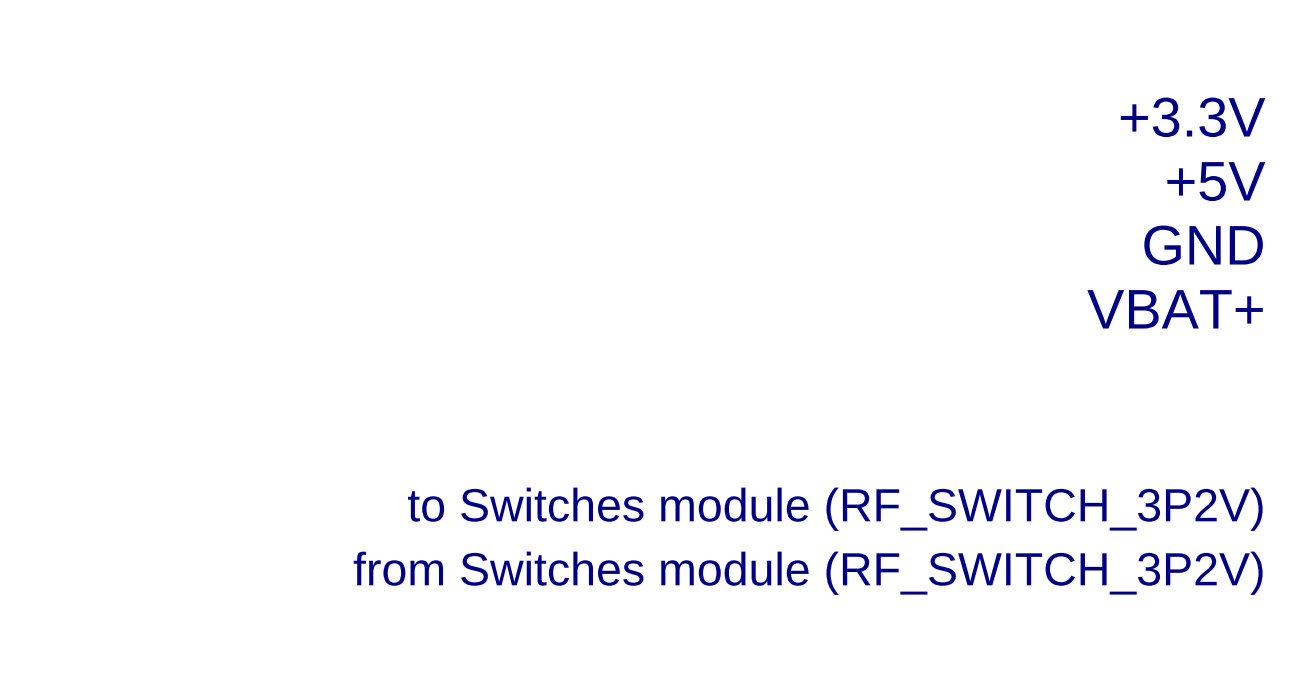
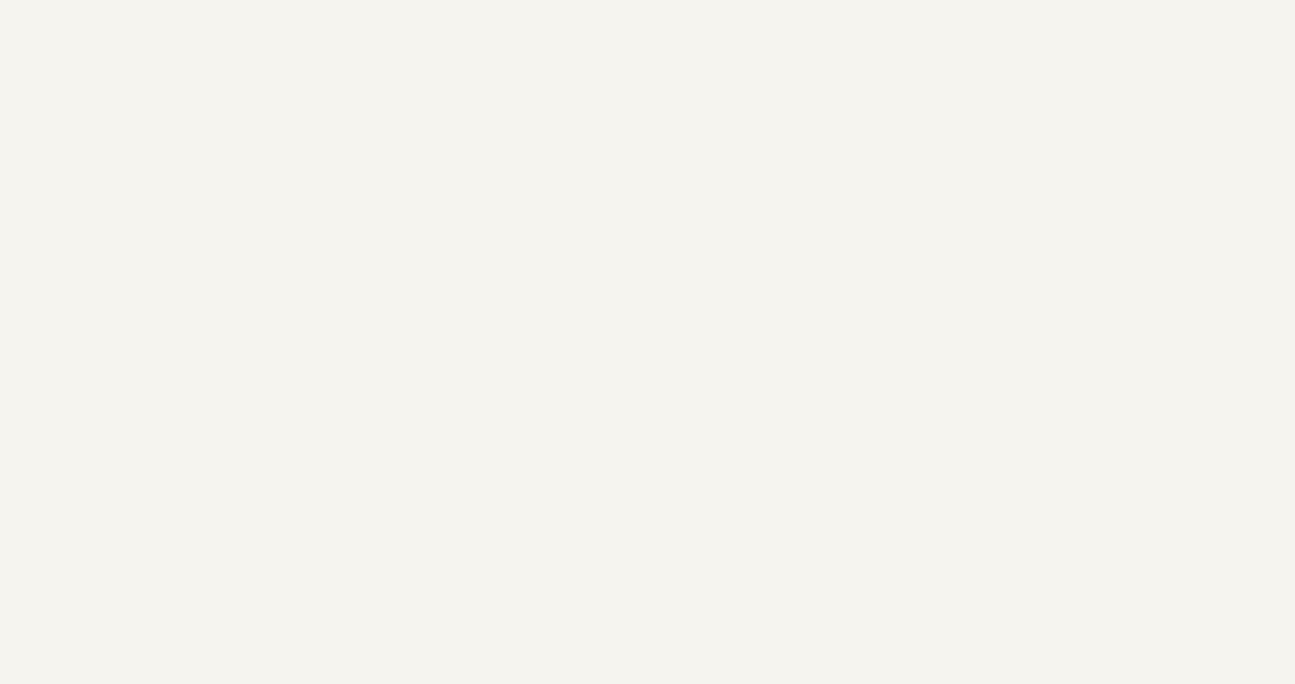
text: +3.3V (1193, 117) -> none
text: +5V (1216, 181) -> none
text: GND (1203, 245) -> none
text: VBAT+ (1175, 309) -> none
text: to Switches module (RF_SWITCH_3P2V) (835, 509) -> none
text: from Switches module (RF_SWITCH_3P2V) (808, 573) -> none

